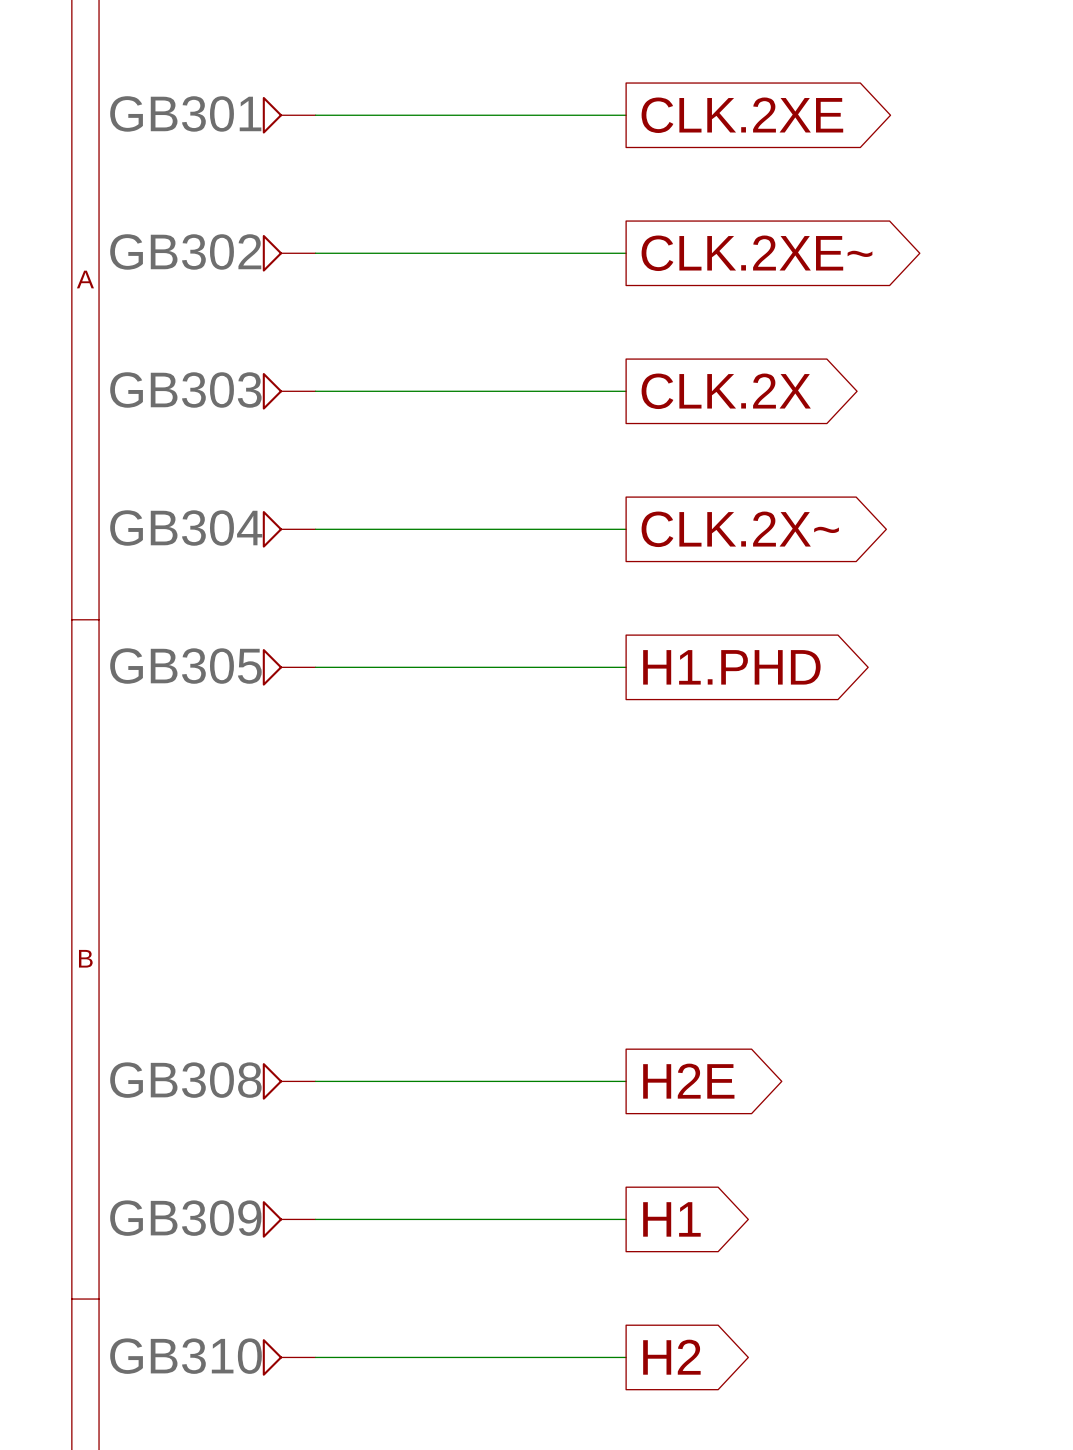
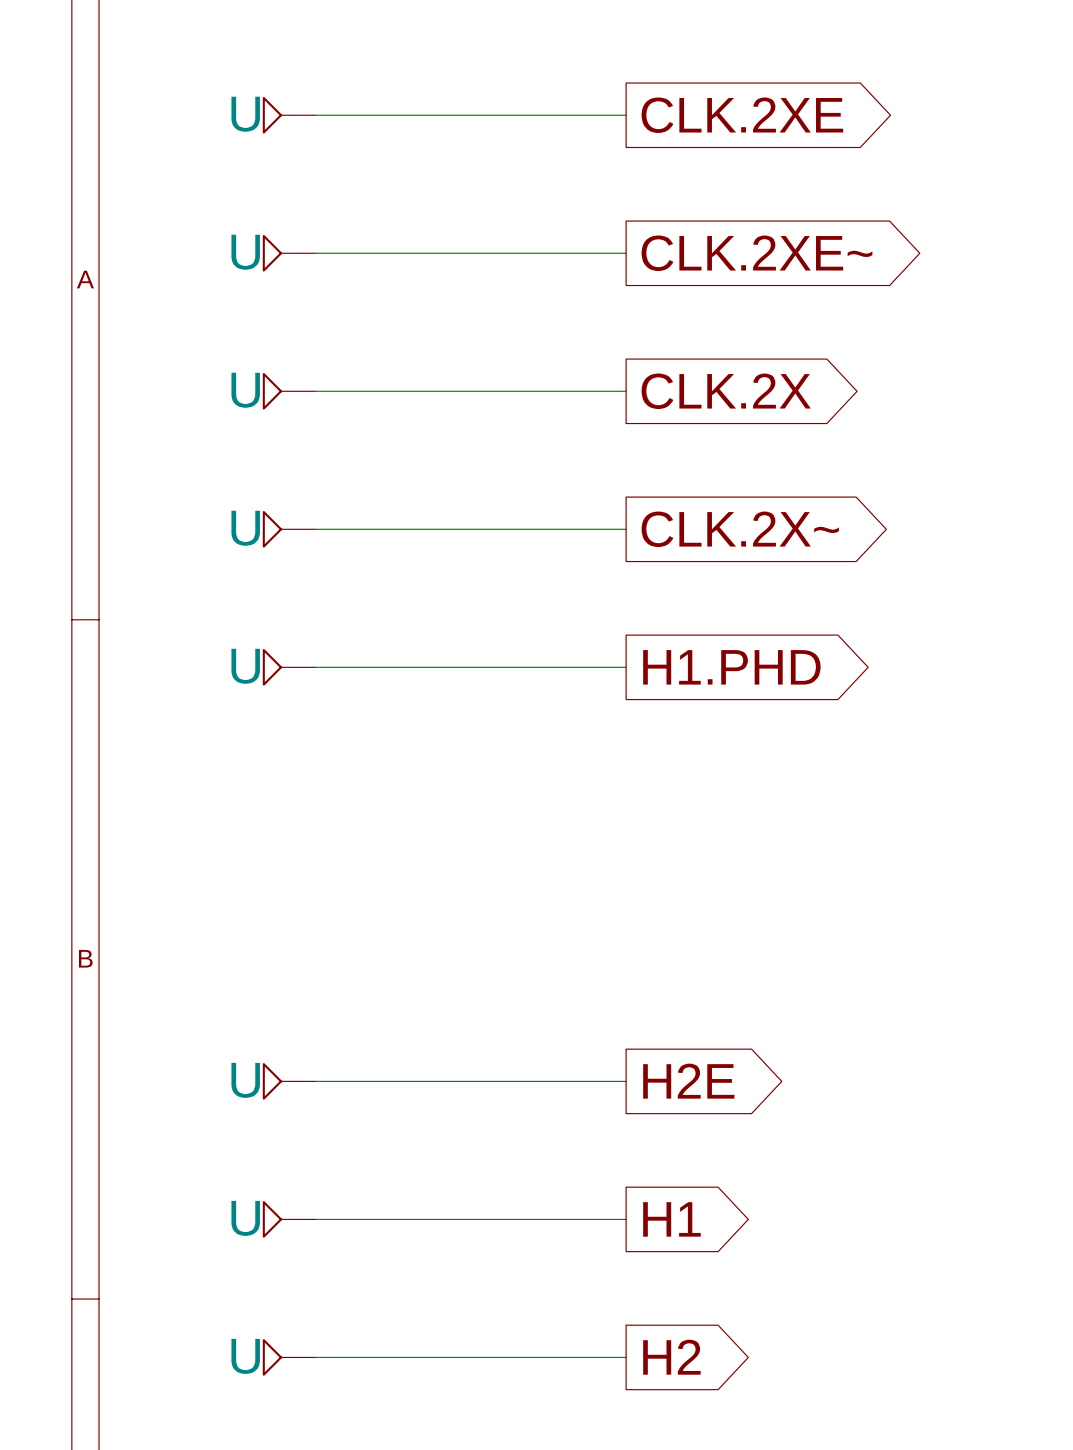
GB301 name: GB301 (185, 113) -> U (245, 114)
GB302 name: GB302 (185, 251) -> U (245, 252)
GB303 name: GB303 (185, 389) -> U (245, 390)
GB304 name: GB304 (186, 528) -> U (245, 528)
GB305 name: GB305 (185, 666) -> U (245, 666)
GB308 name: GB308 (185, 1080) -> U (245, 1080)
GB309 name: GB309 (185, 1218) -> U (245, 1218)
GB310 name: GB310 (186, 1356) -> U (245, 1356)

